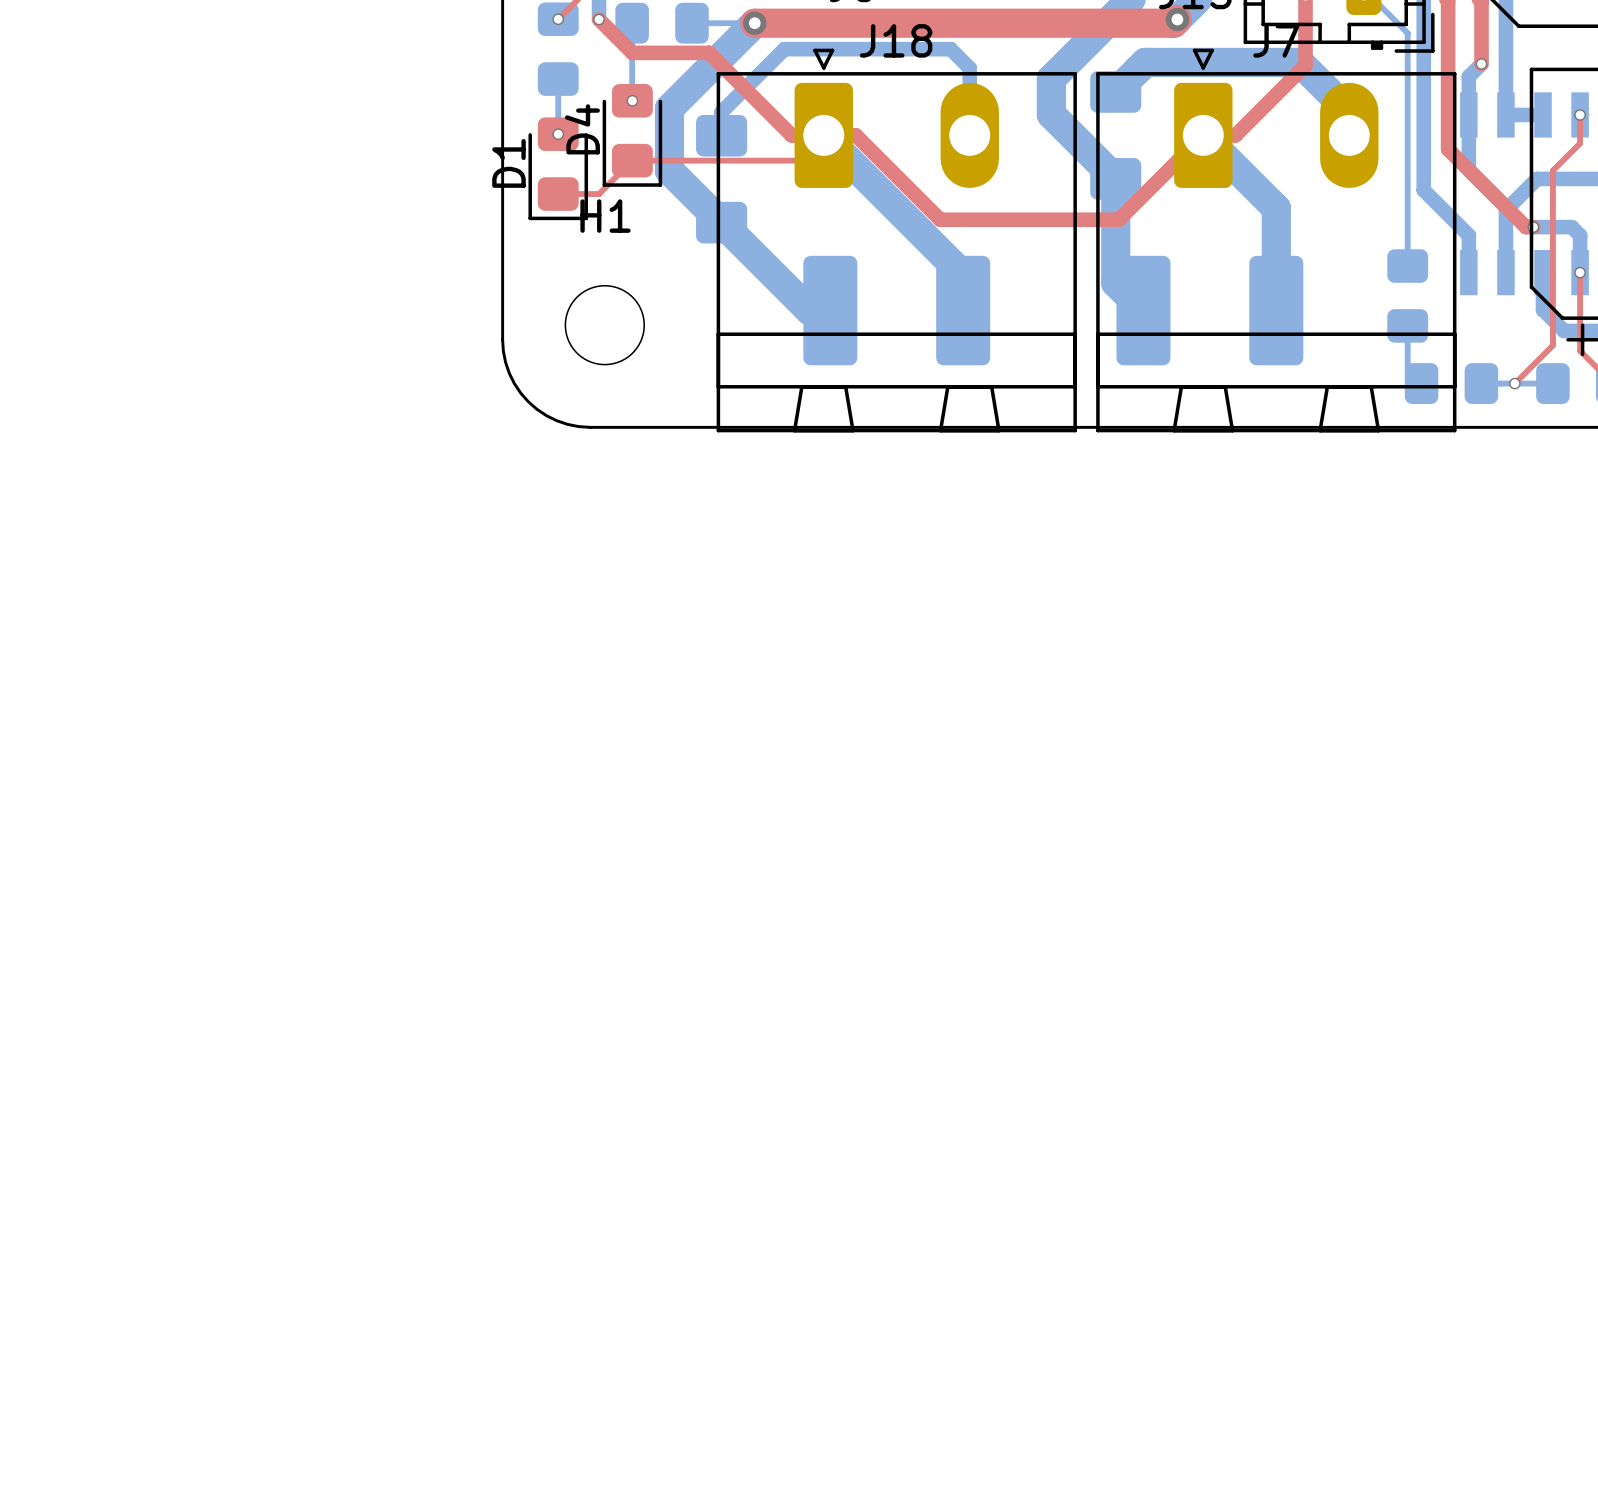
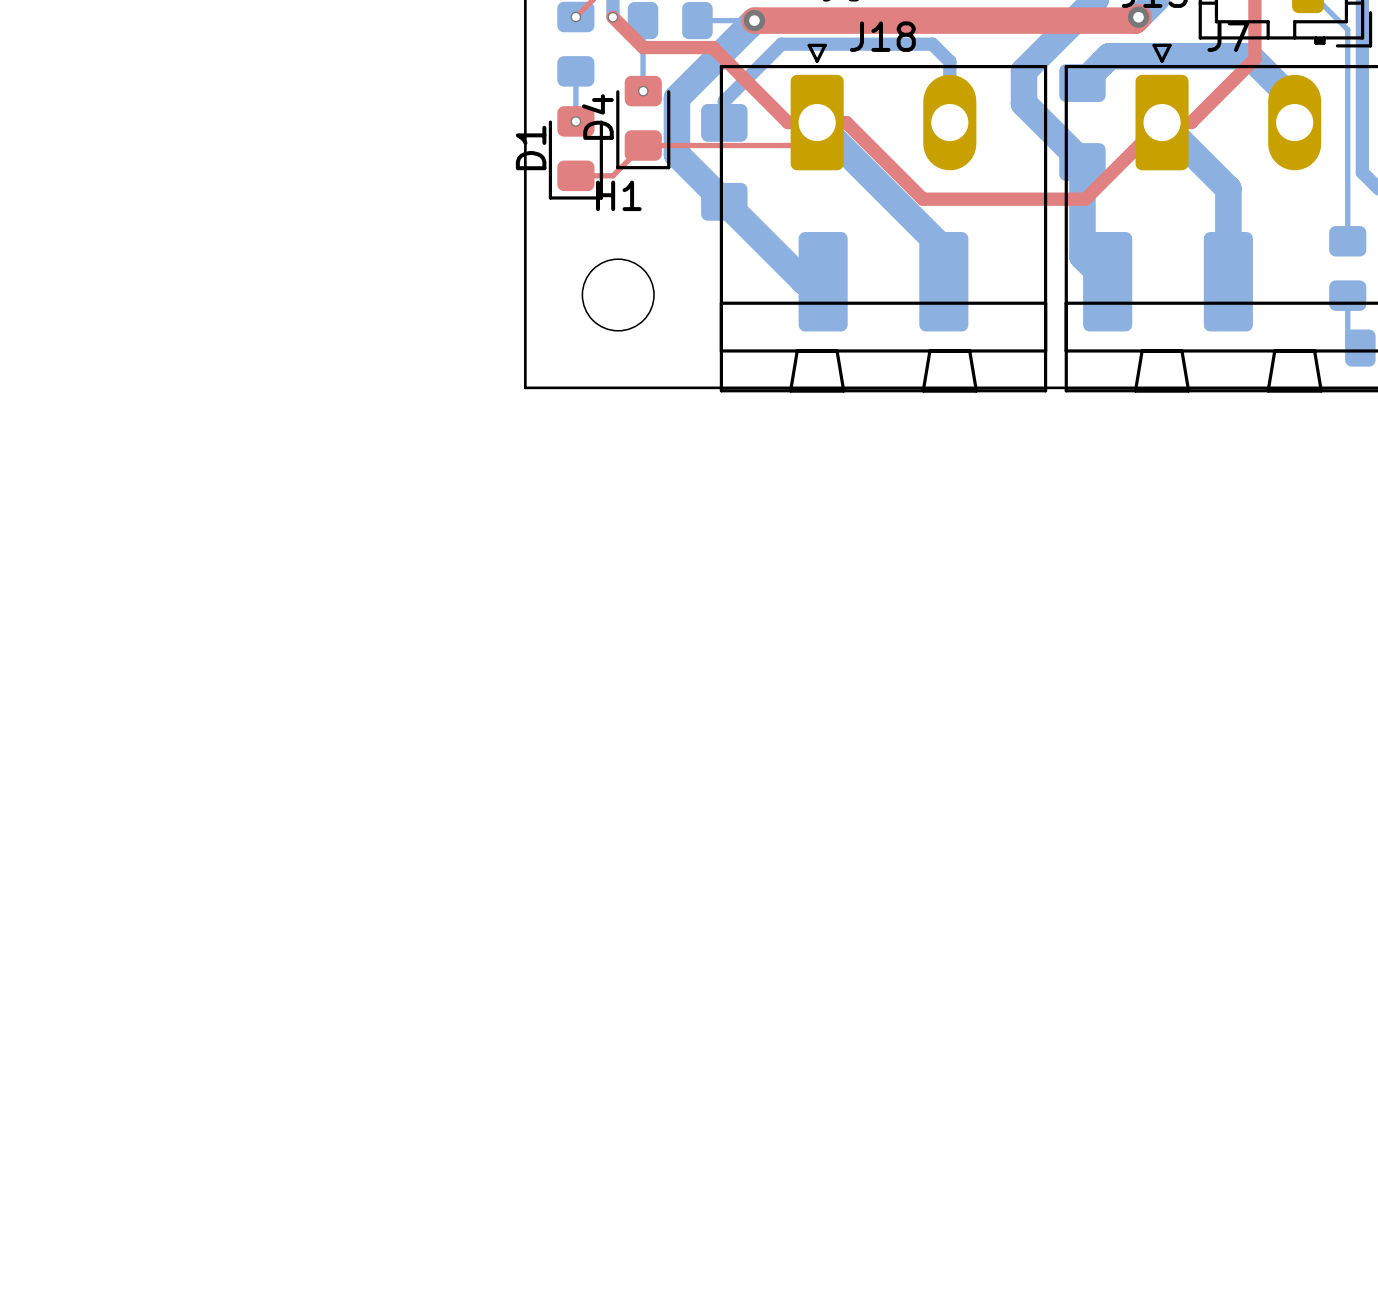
board edge: (502, 339) (509, 373) (528, 401) (556, 420) (590, 427) -> (525, 308) (525, 387) (604, 387)

